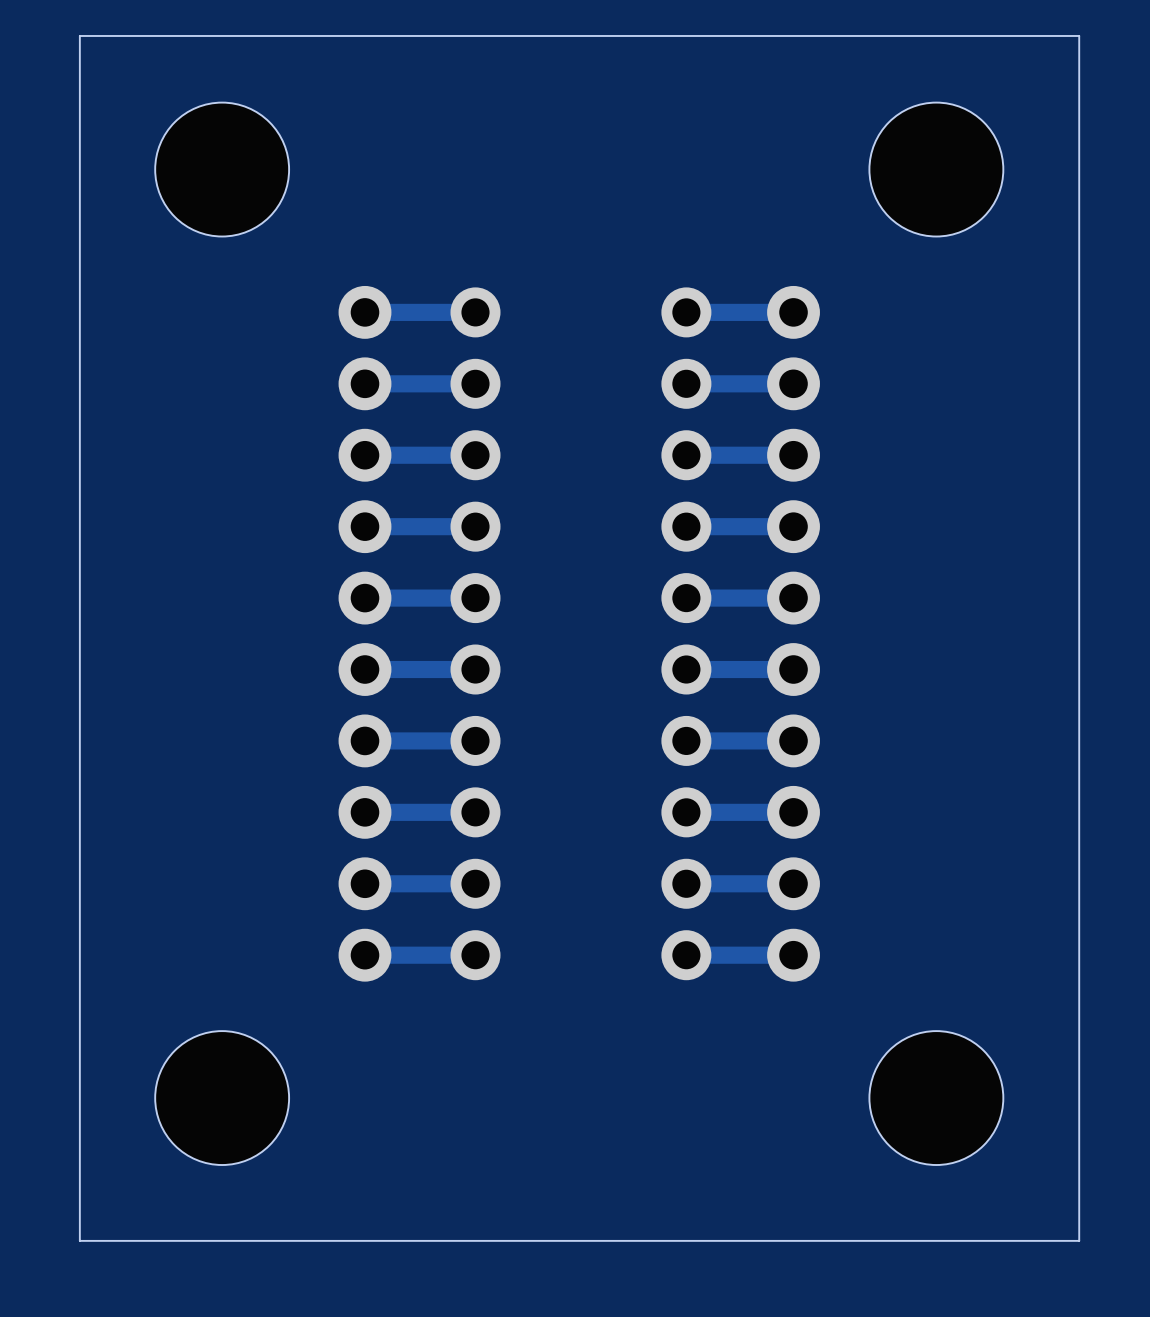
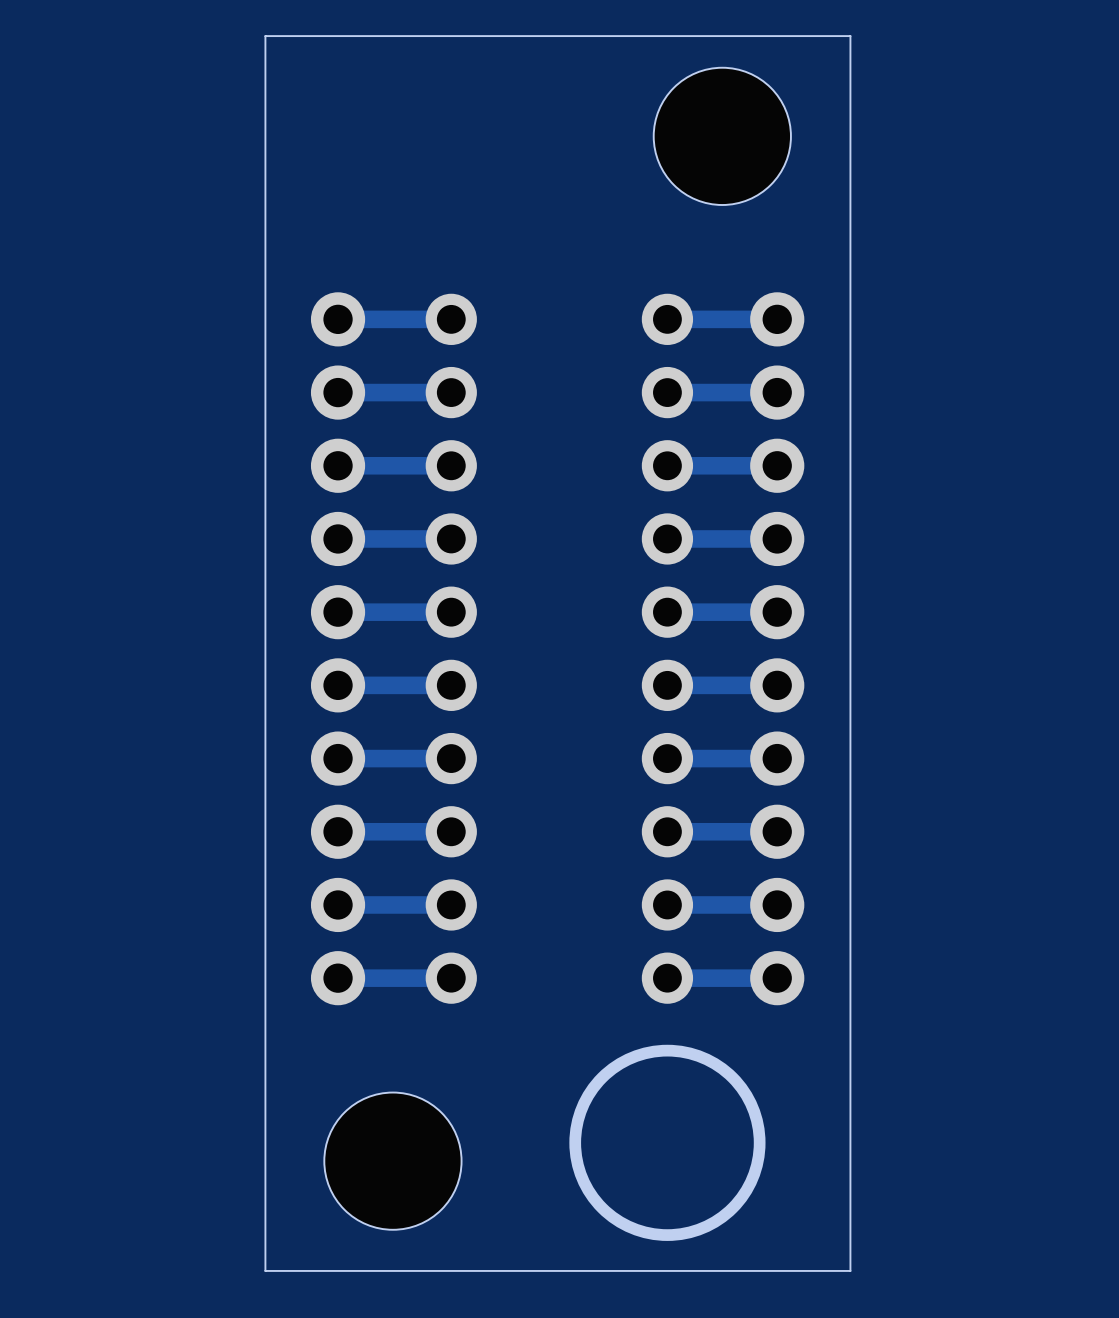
board edge: (294, 35) (79, 35) (79, 1240) (294, 1240) -> (265, 36) (265, 1270)
board edge: (864, 35) (1079, 35) (1079, 1240) (864, 1240) -> (850, 36) (850, 1270)
hole: (222, 169) -> none
hole position: (936, 169) -> (722, 136)
round board edge: none -> [569, 1044, 766, 1241]
hole position: (222, 1098) -> (392, 1161)
hole: (936, 1098) -> none

